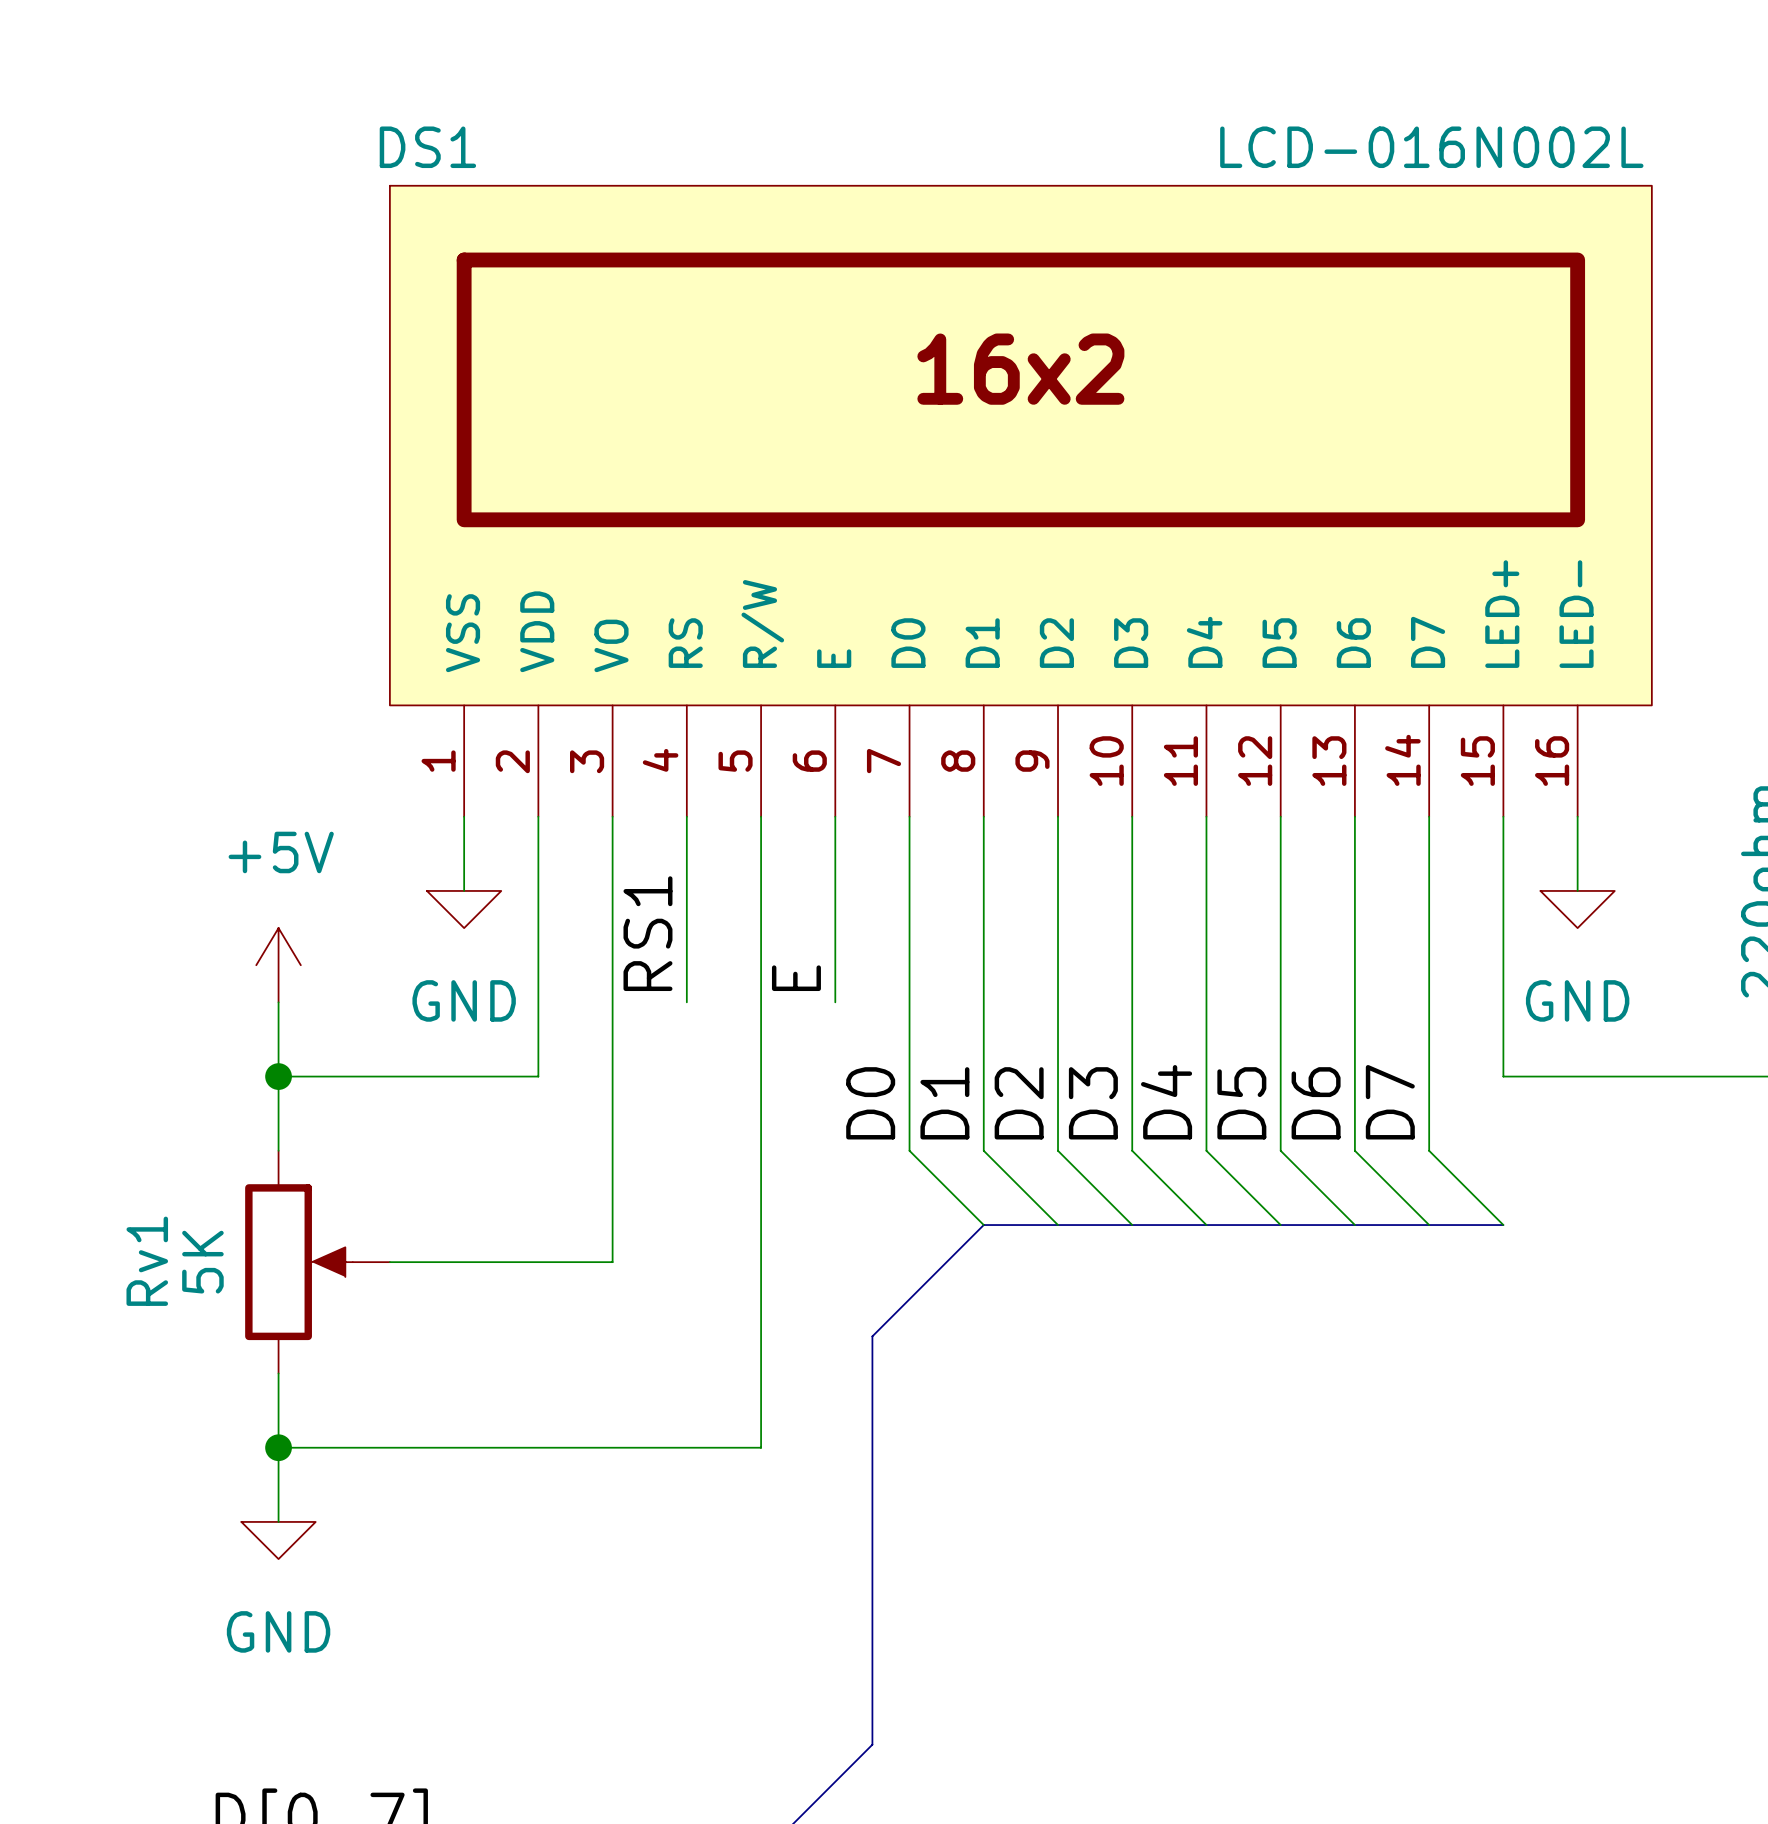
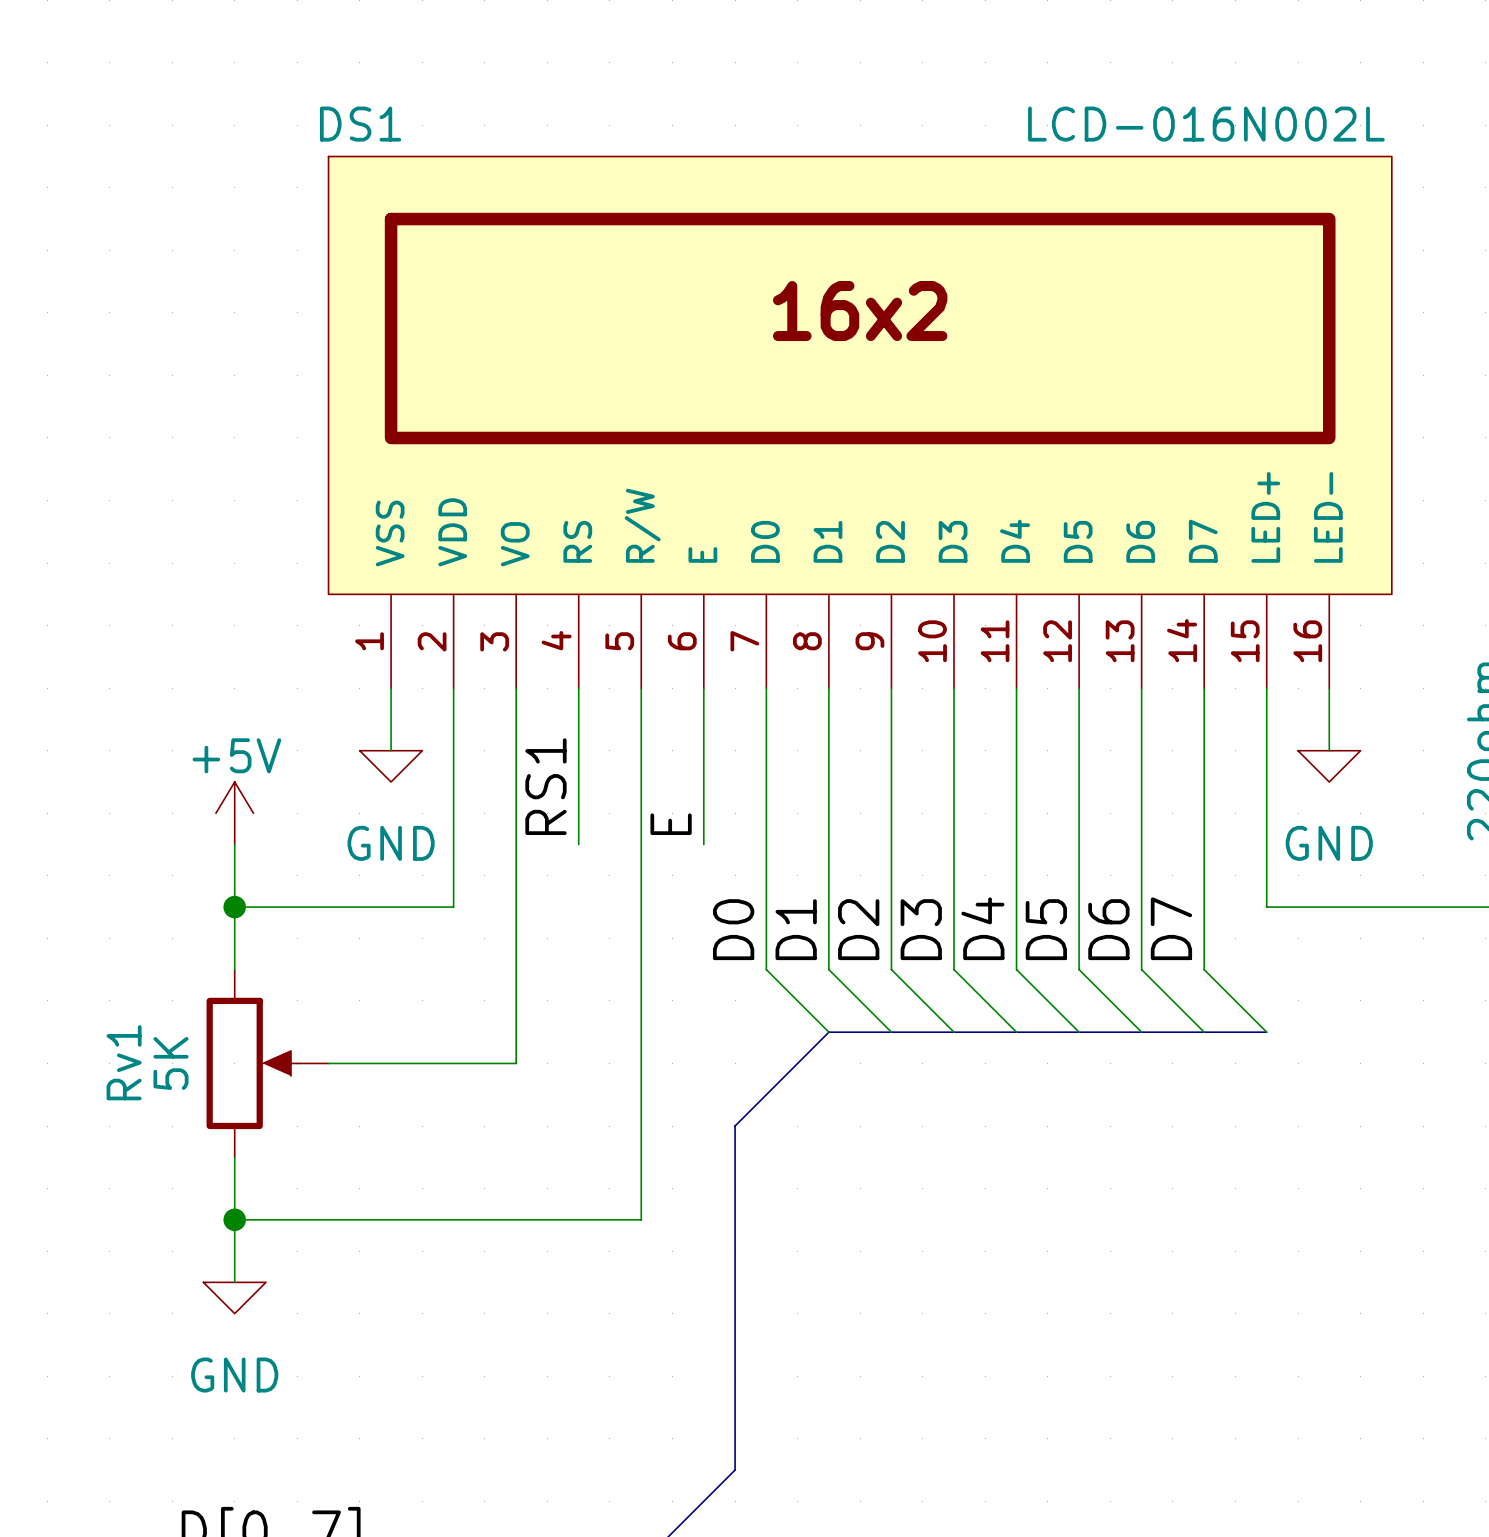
power symbol text position: +5V (281, 852) -> +5V (236, 755)

